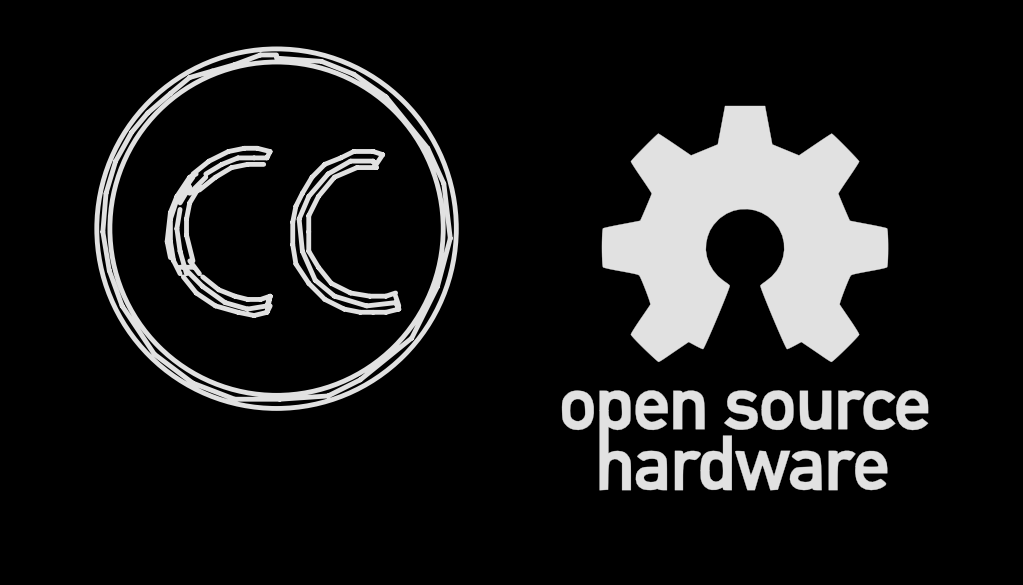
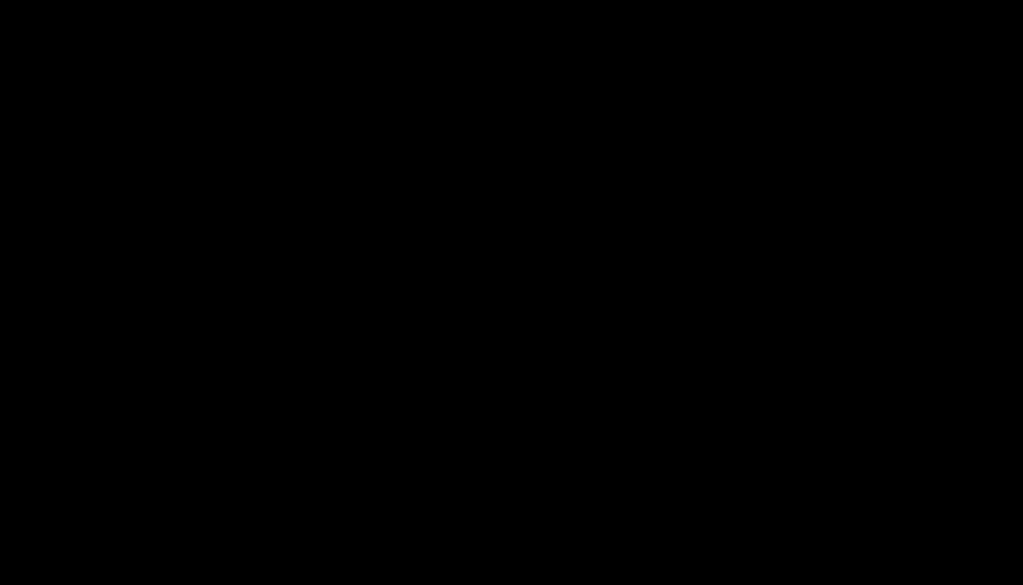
drawing: [94, 46, 459, 411] -> none
drawing: [561, 105, 929, 491] -> none

